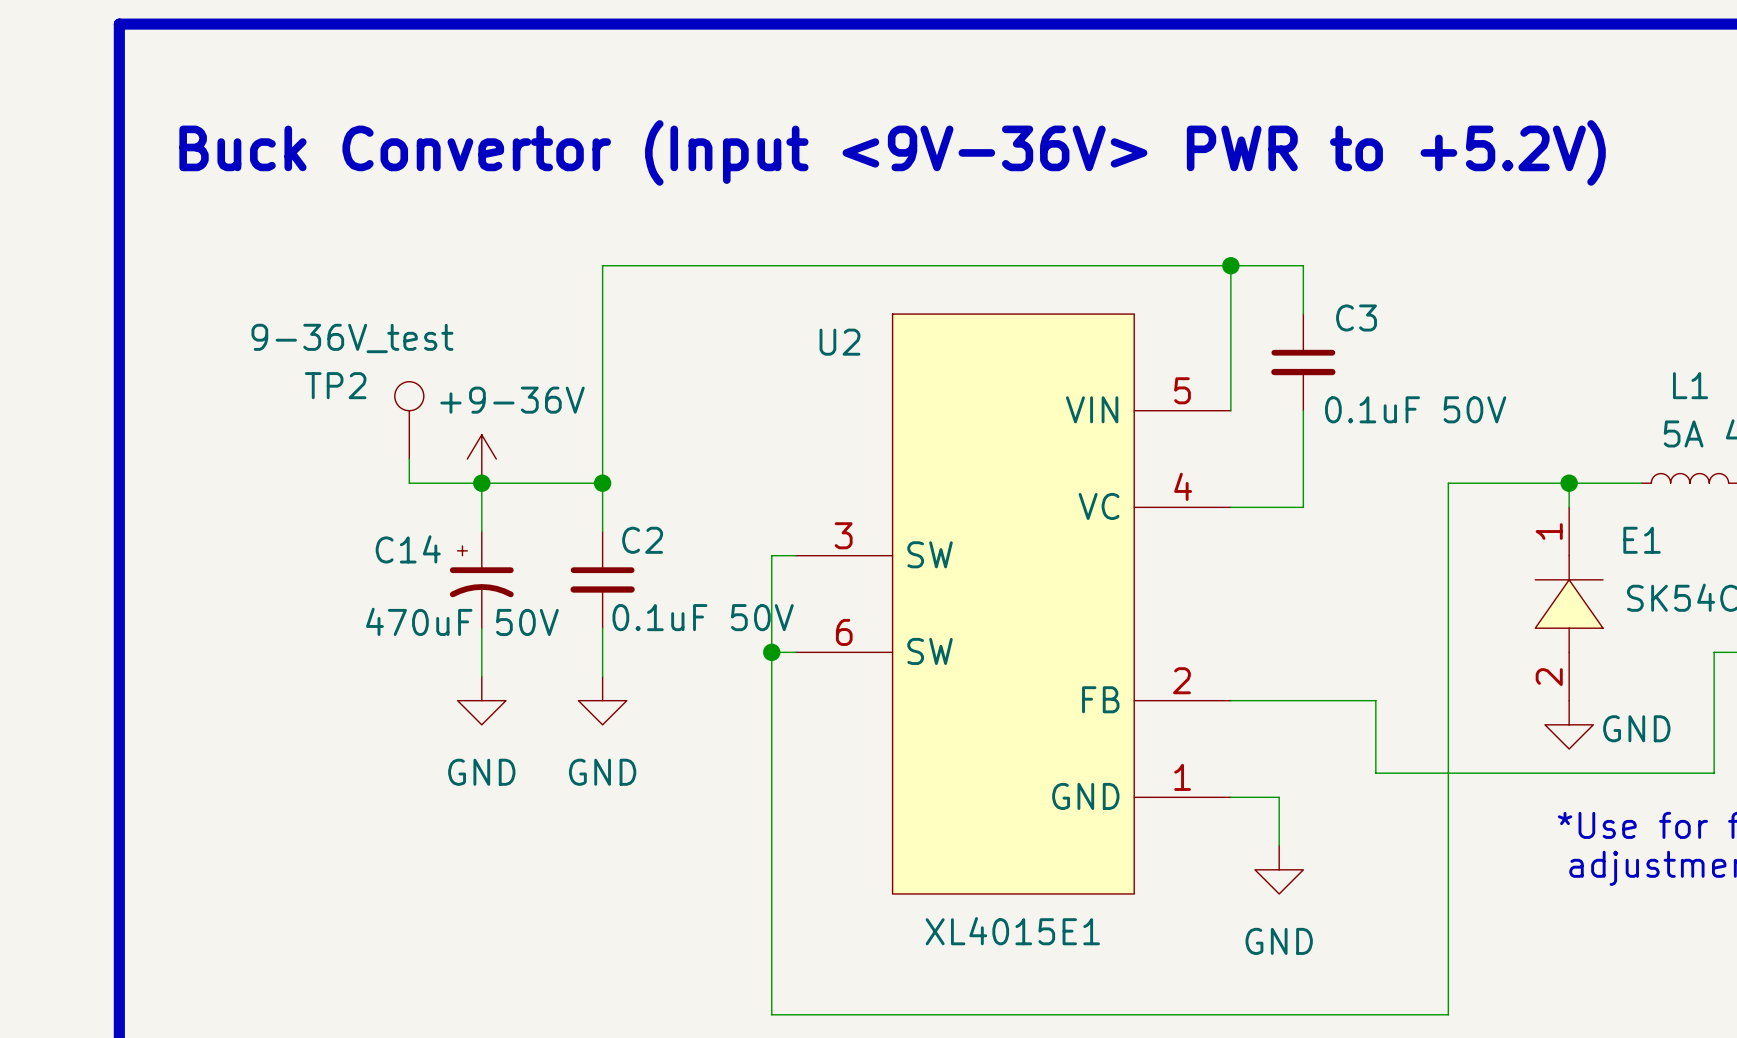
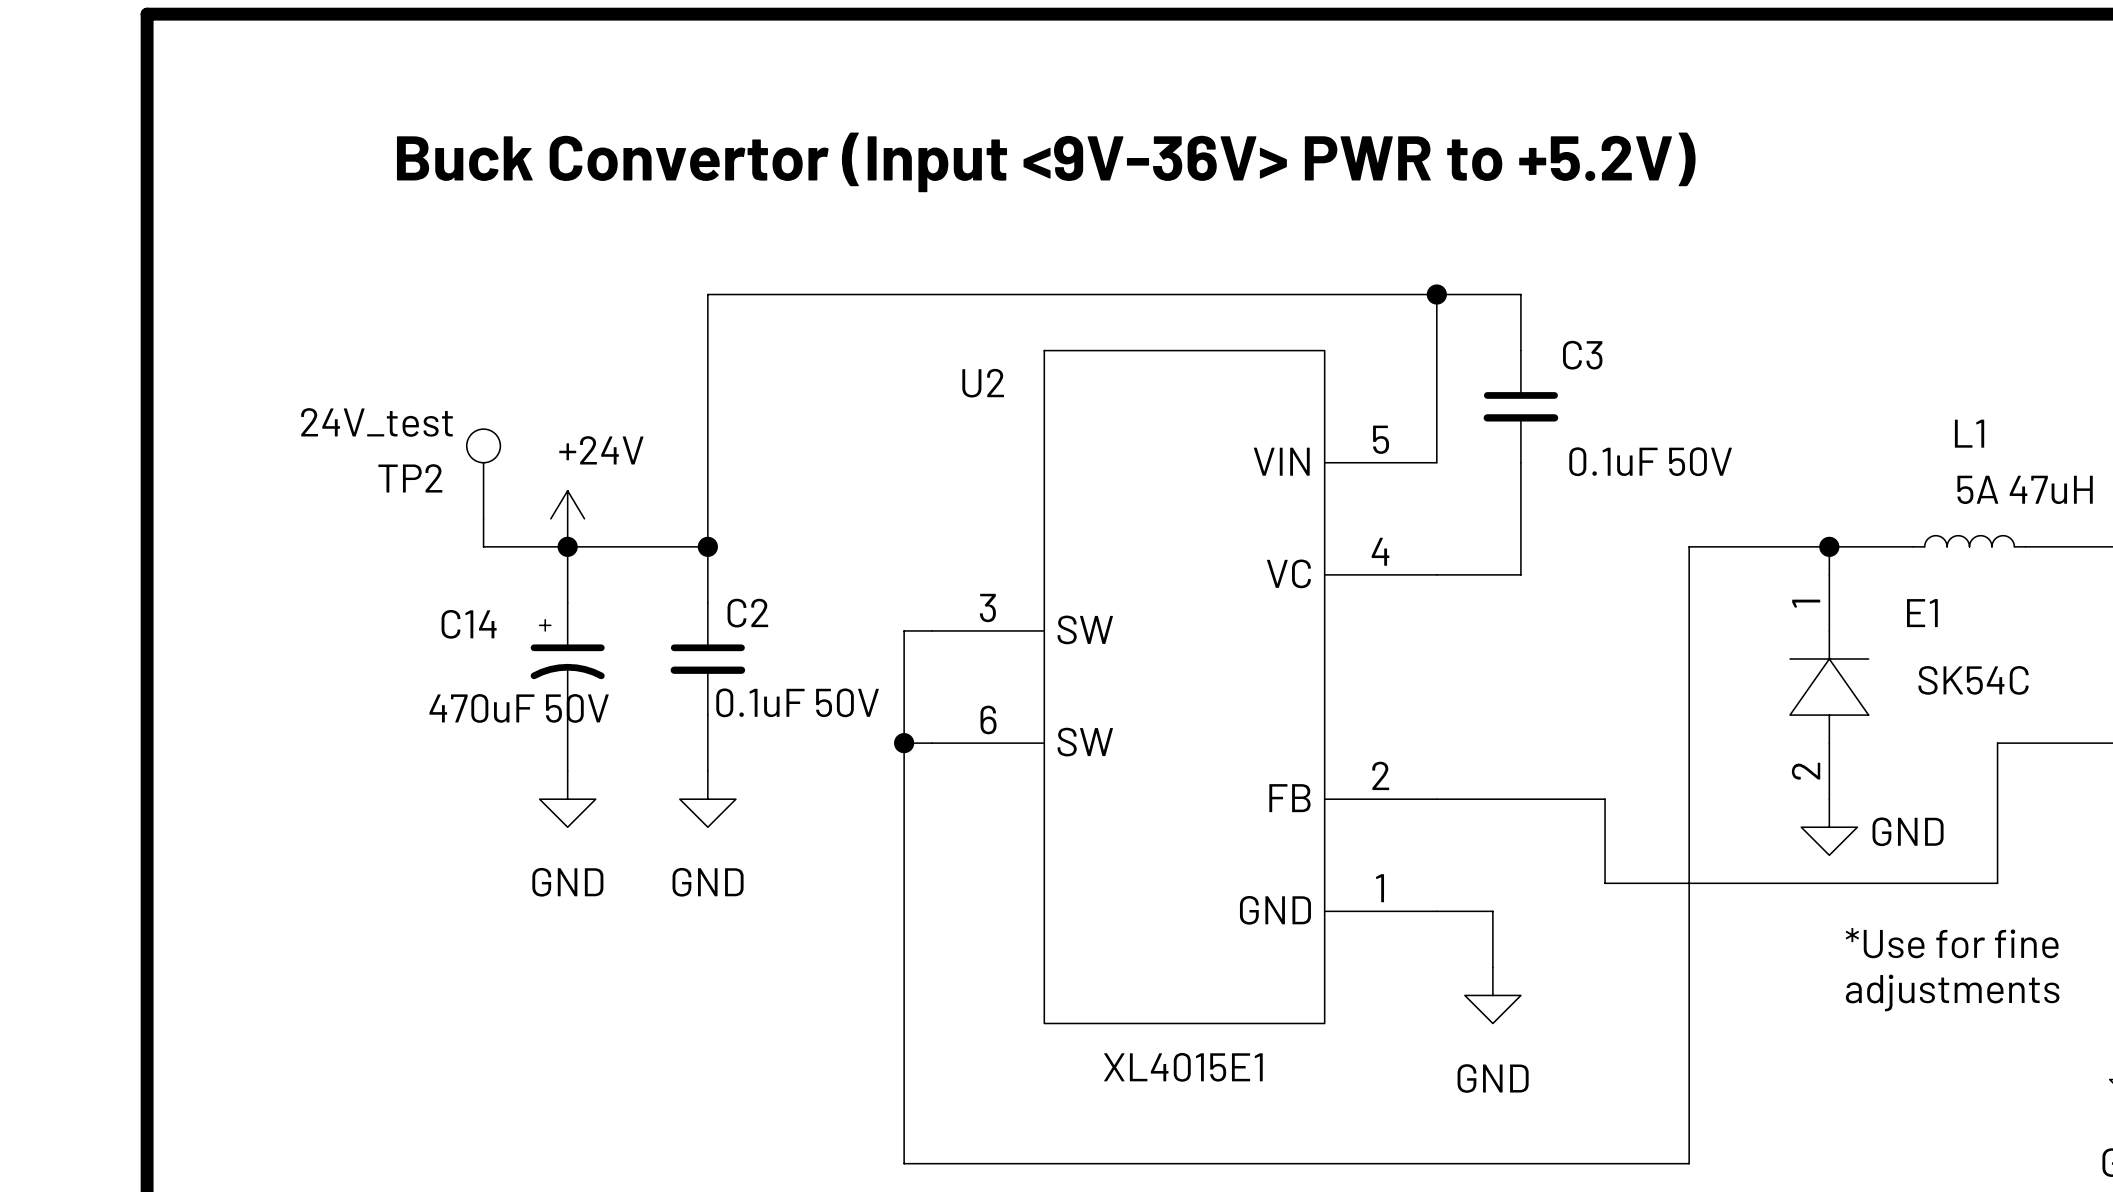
TP2 value: 9-36V_test (352, 338) -> 24V_test (377, 422)
TP2 name position: TP2 (335, 385) -> TP2 (410, 478)
power symbol: +9-36V (481, 459) -> +24V (567, 518)

